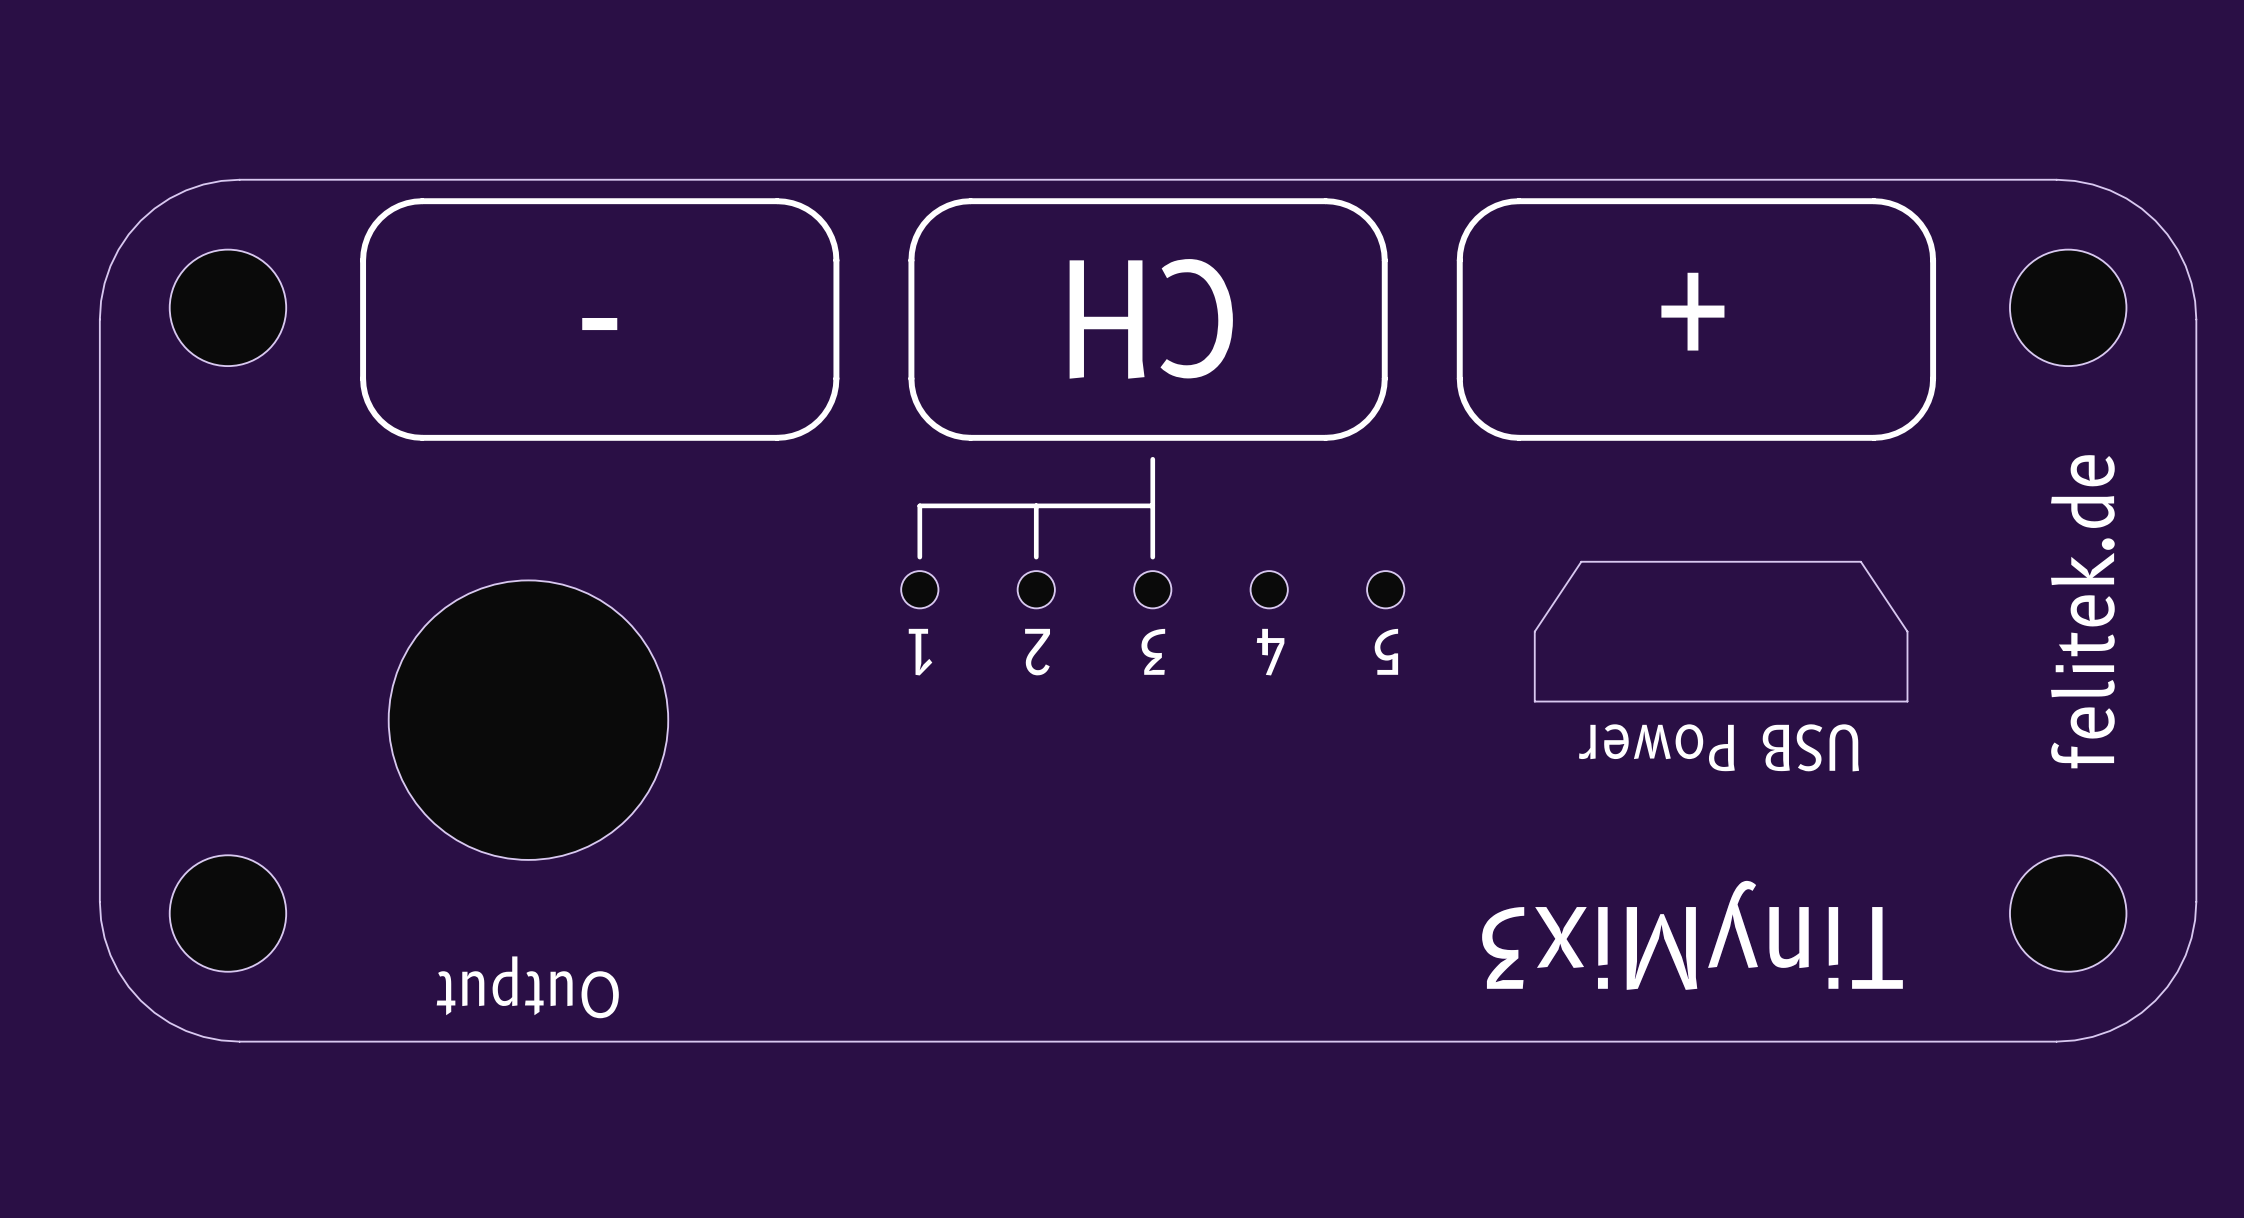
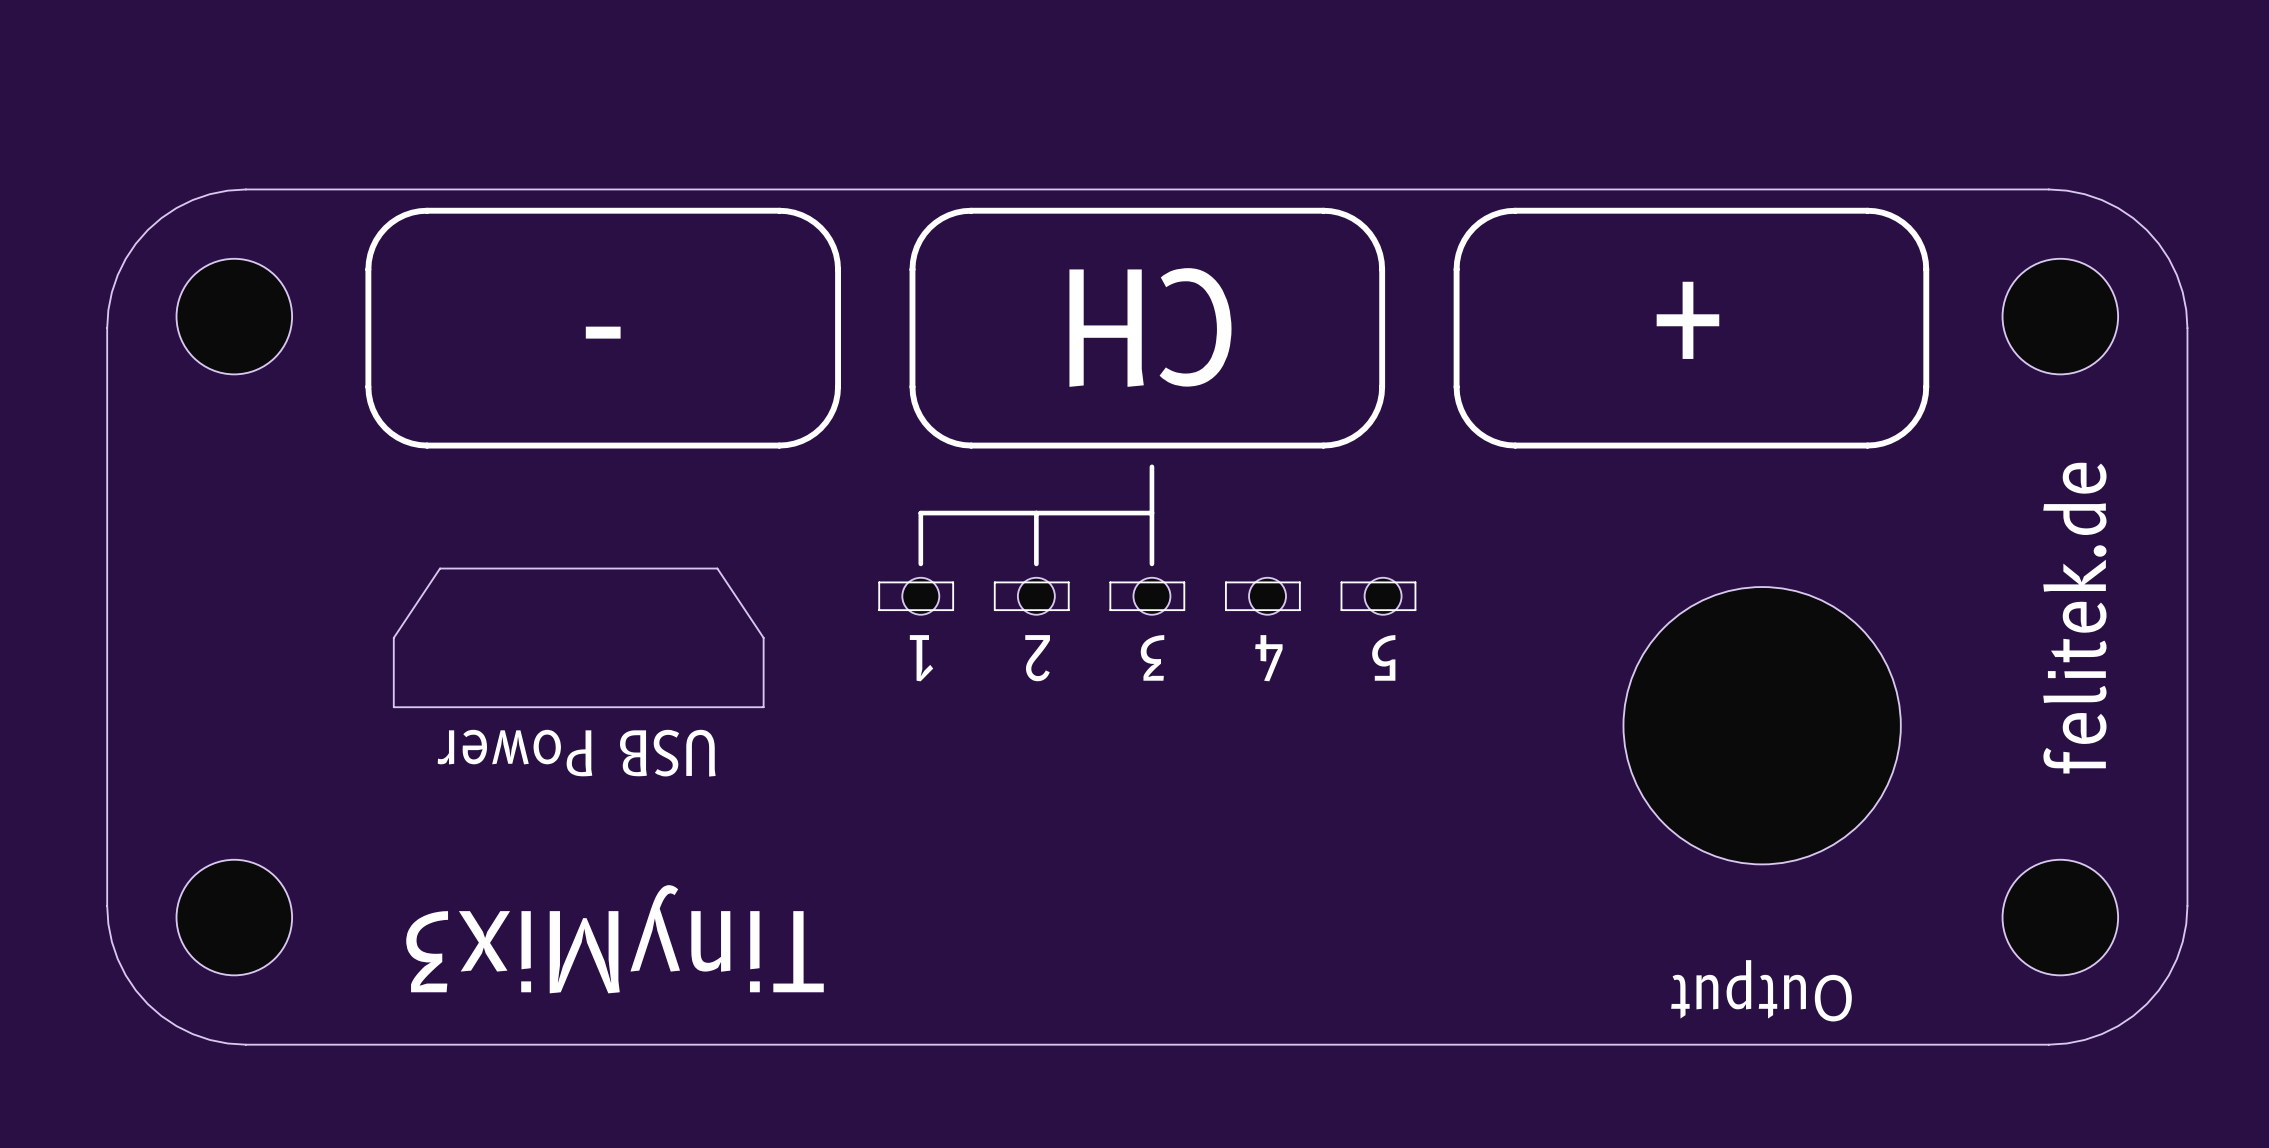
part footprint: [901, 571, 939, 609] -> [879, 577, 954, 615]
part footprint: [1017, 571, 1055, 609] -> [994, 577, 1069, 615]
part footprint: [1134, 571, 1172, 609] -> [1110, 577, 1185, 615]
part footprint: [1250, 571, 1288, 609] -> [1225, 577, 1300, 615]
part footprint: [1367, 571, 1405, 609] -> [1341, 577, 1416, 615]
drawing position: (1721, 631) -> (578, 637)
part: (528, 720) -> none
part: none -> (1762, 725)
text position: USB Power (1719, 747) -> USB Power (576, 753)
text: none -> TinyMix3 (615, 939)
text: TinyMix3 (1692, 935) -> none
text: Output (527, 987) -> none
text: none -> Output (1761, 990)

